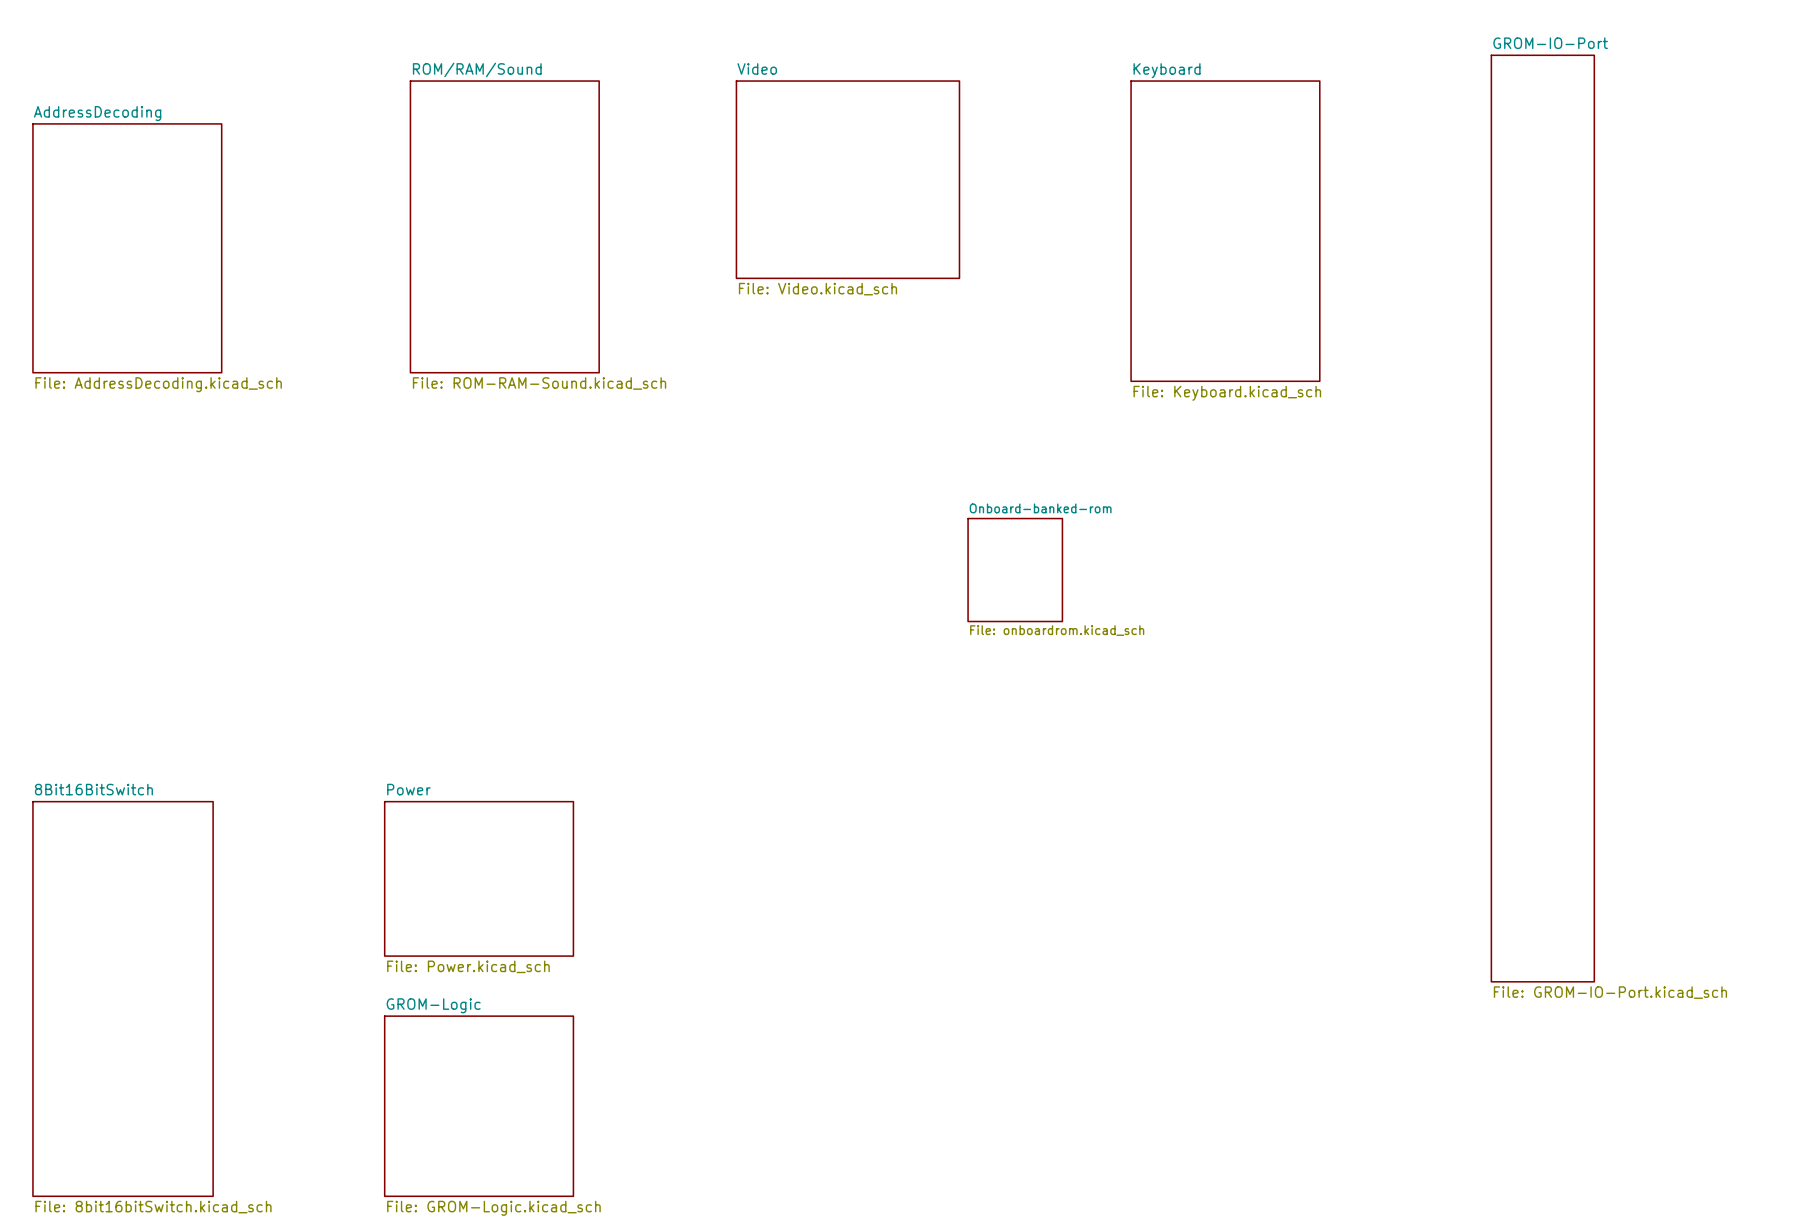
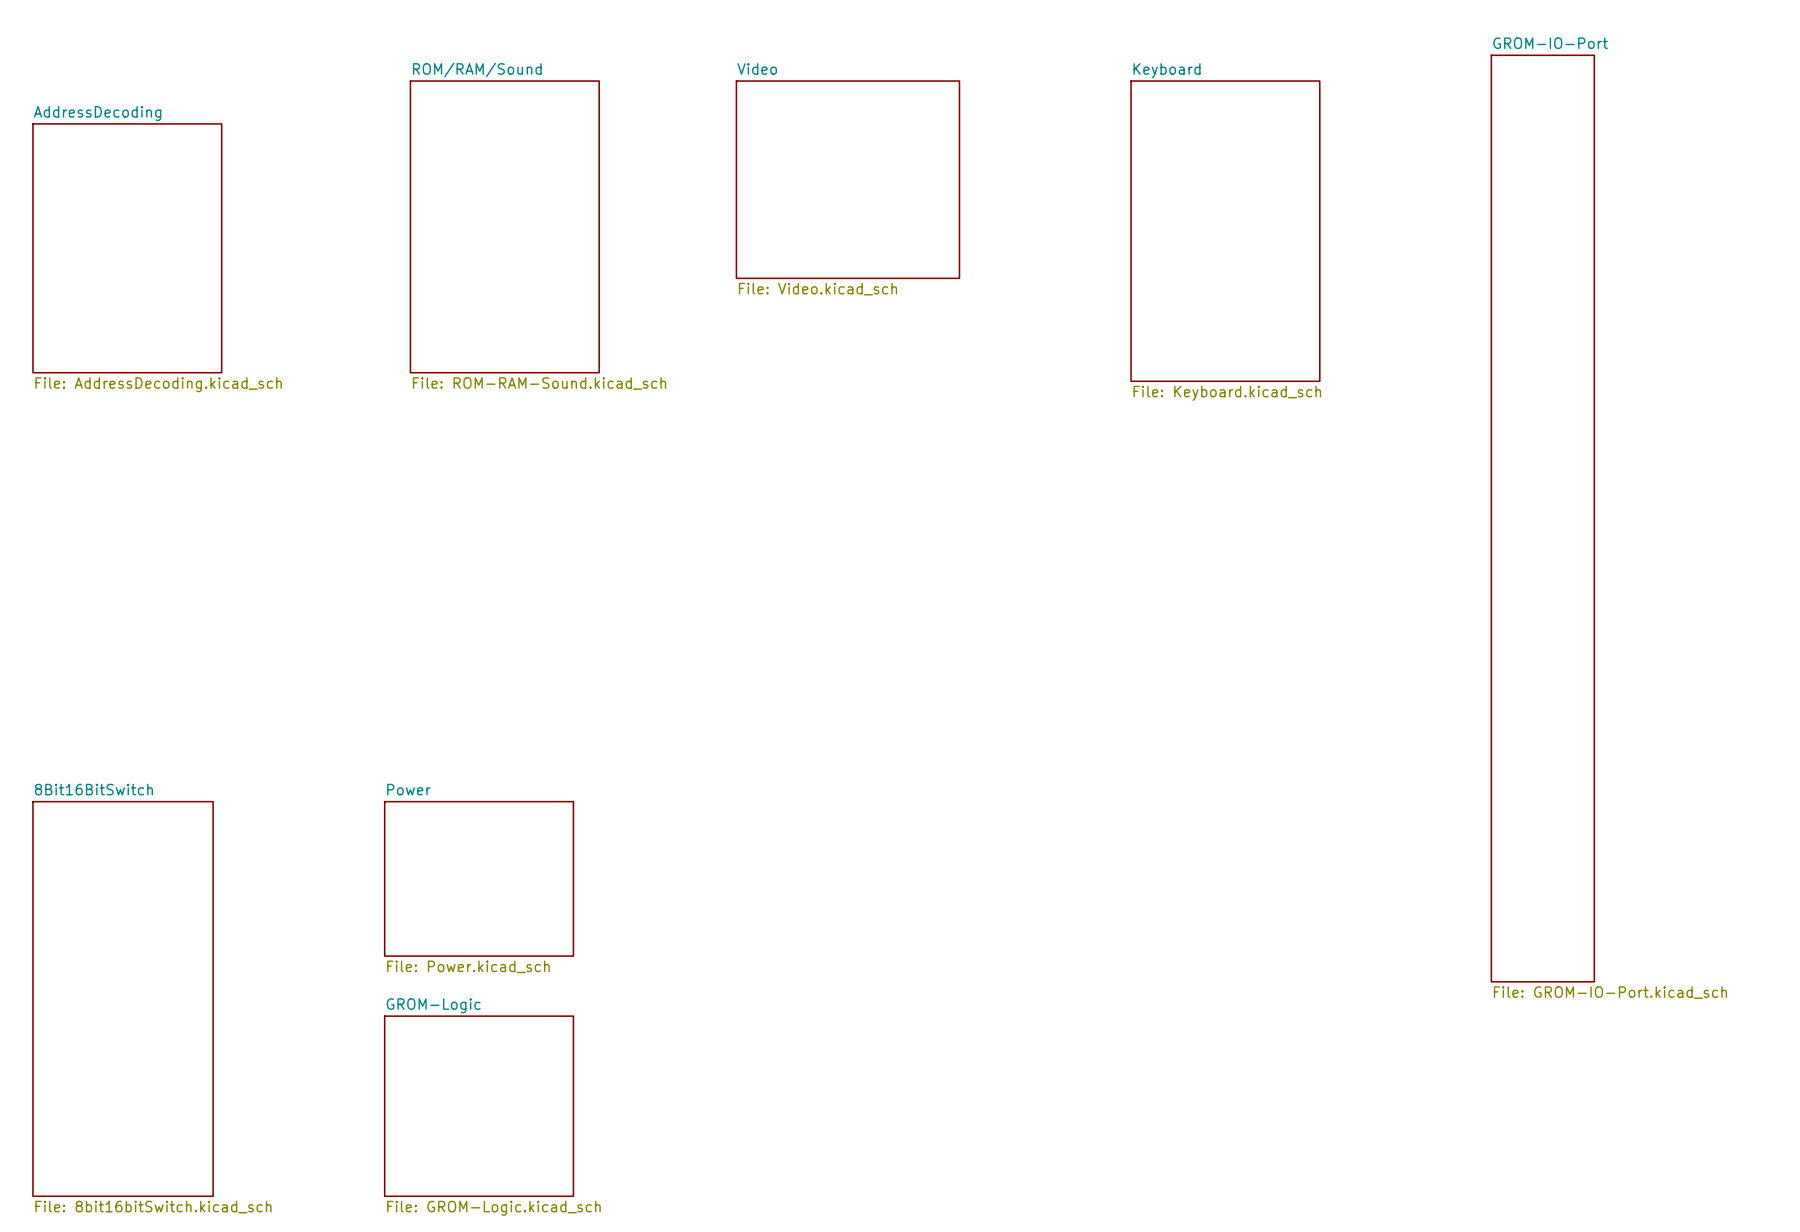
sheet Onboard-banked-rom: File: onboardrom.kicad_sch (1015, 570) -> none

